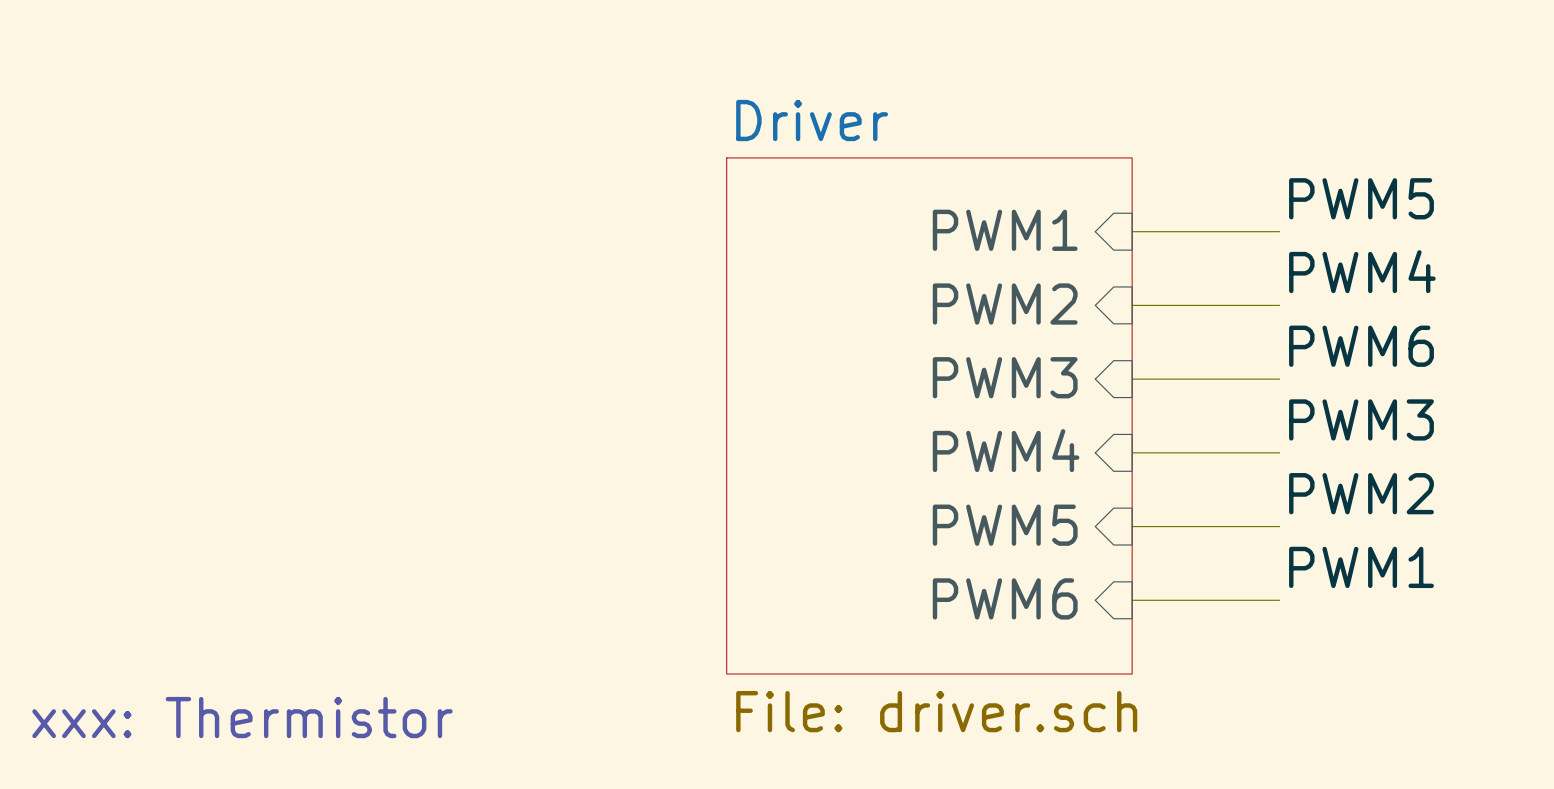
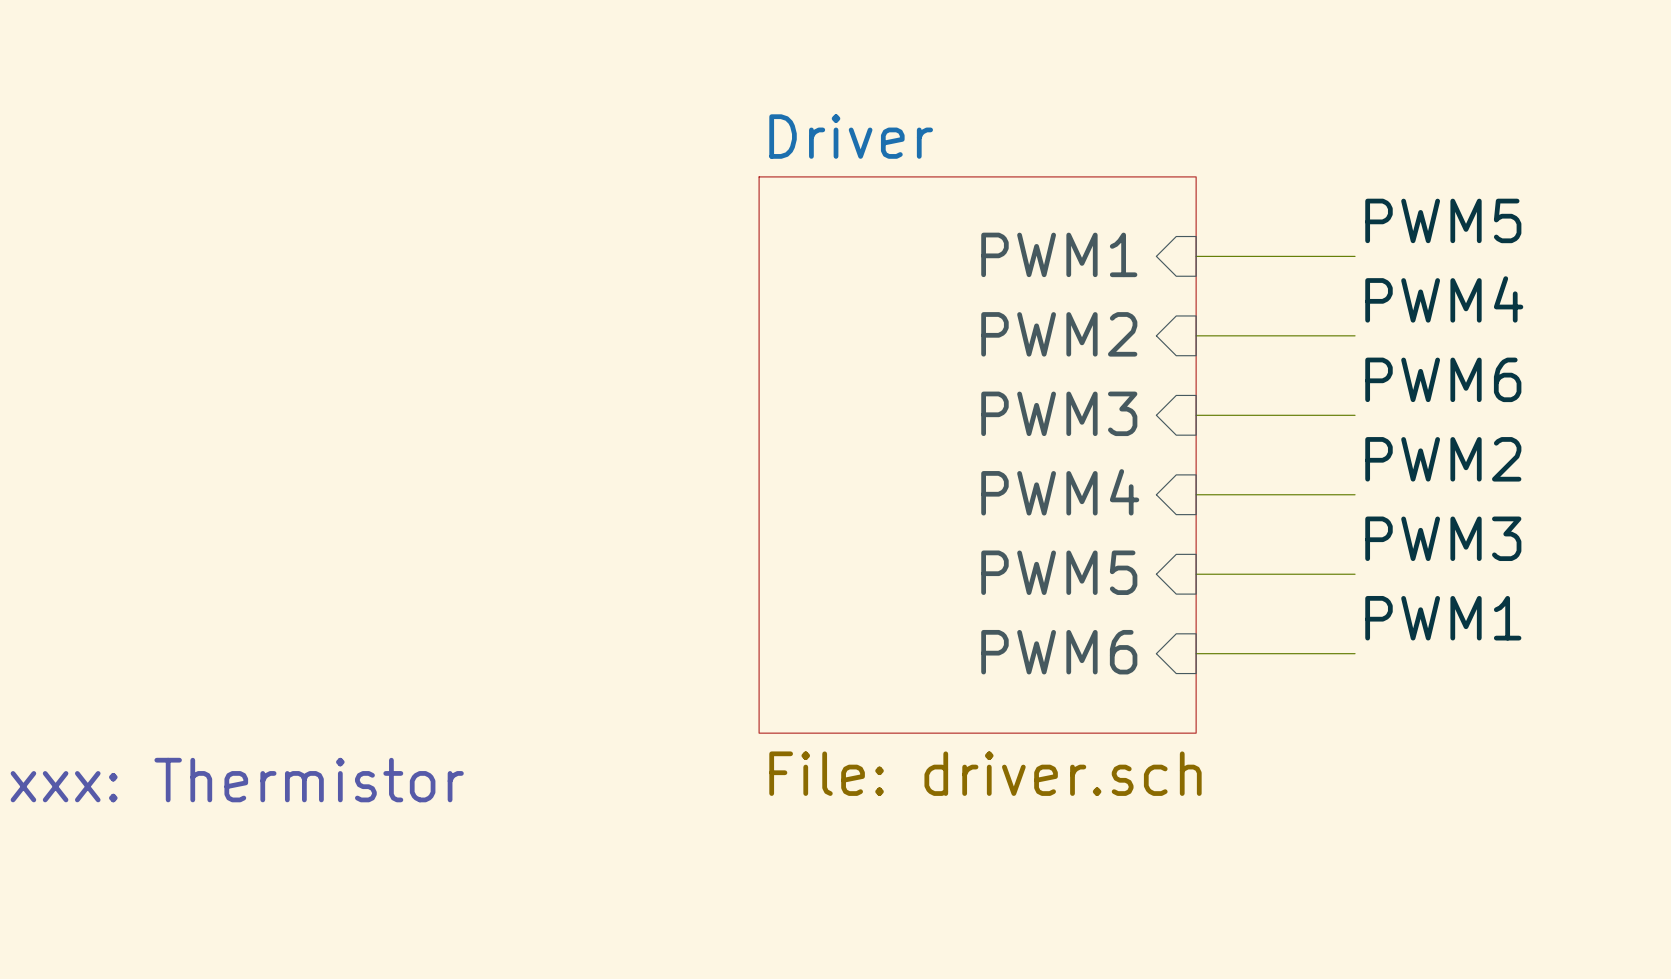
label: PWM3 (1361, 419) -> PWM2 (1443, 459)
label: PWM2 (1361, 493) -> PWM3 (1443, 538)

